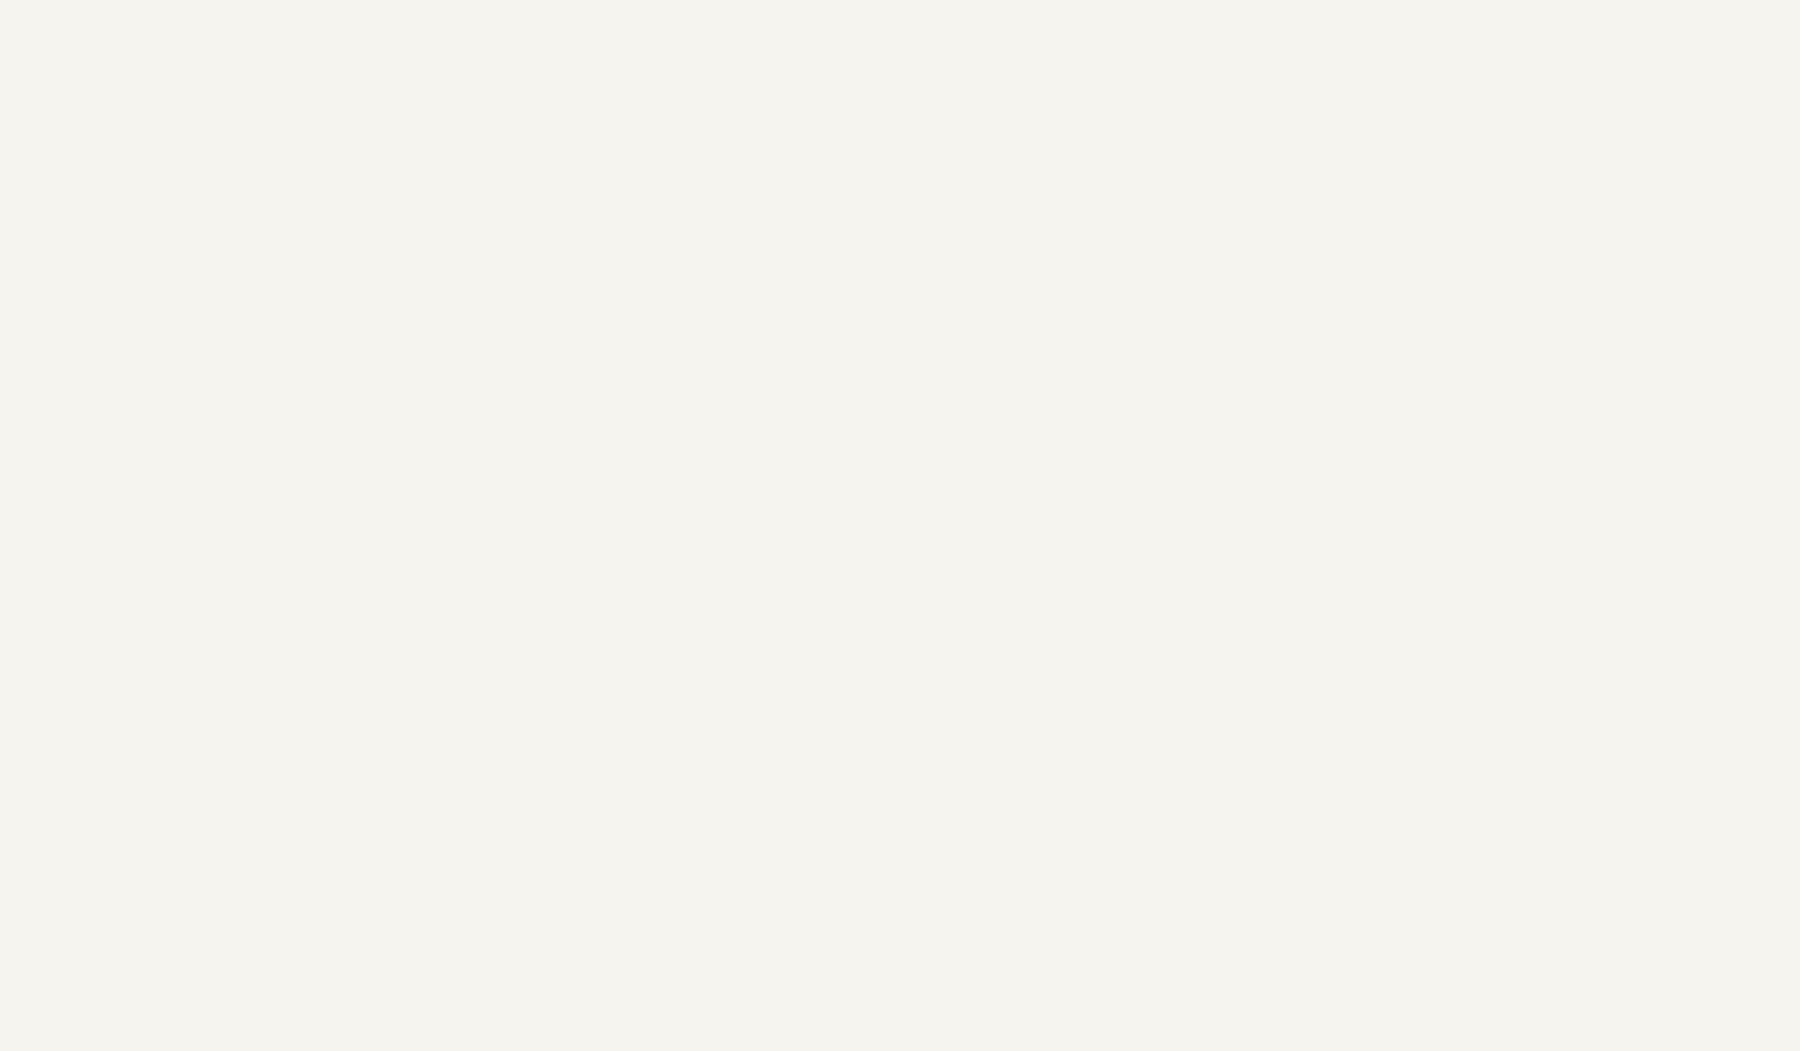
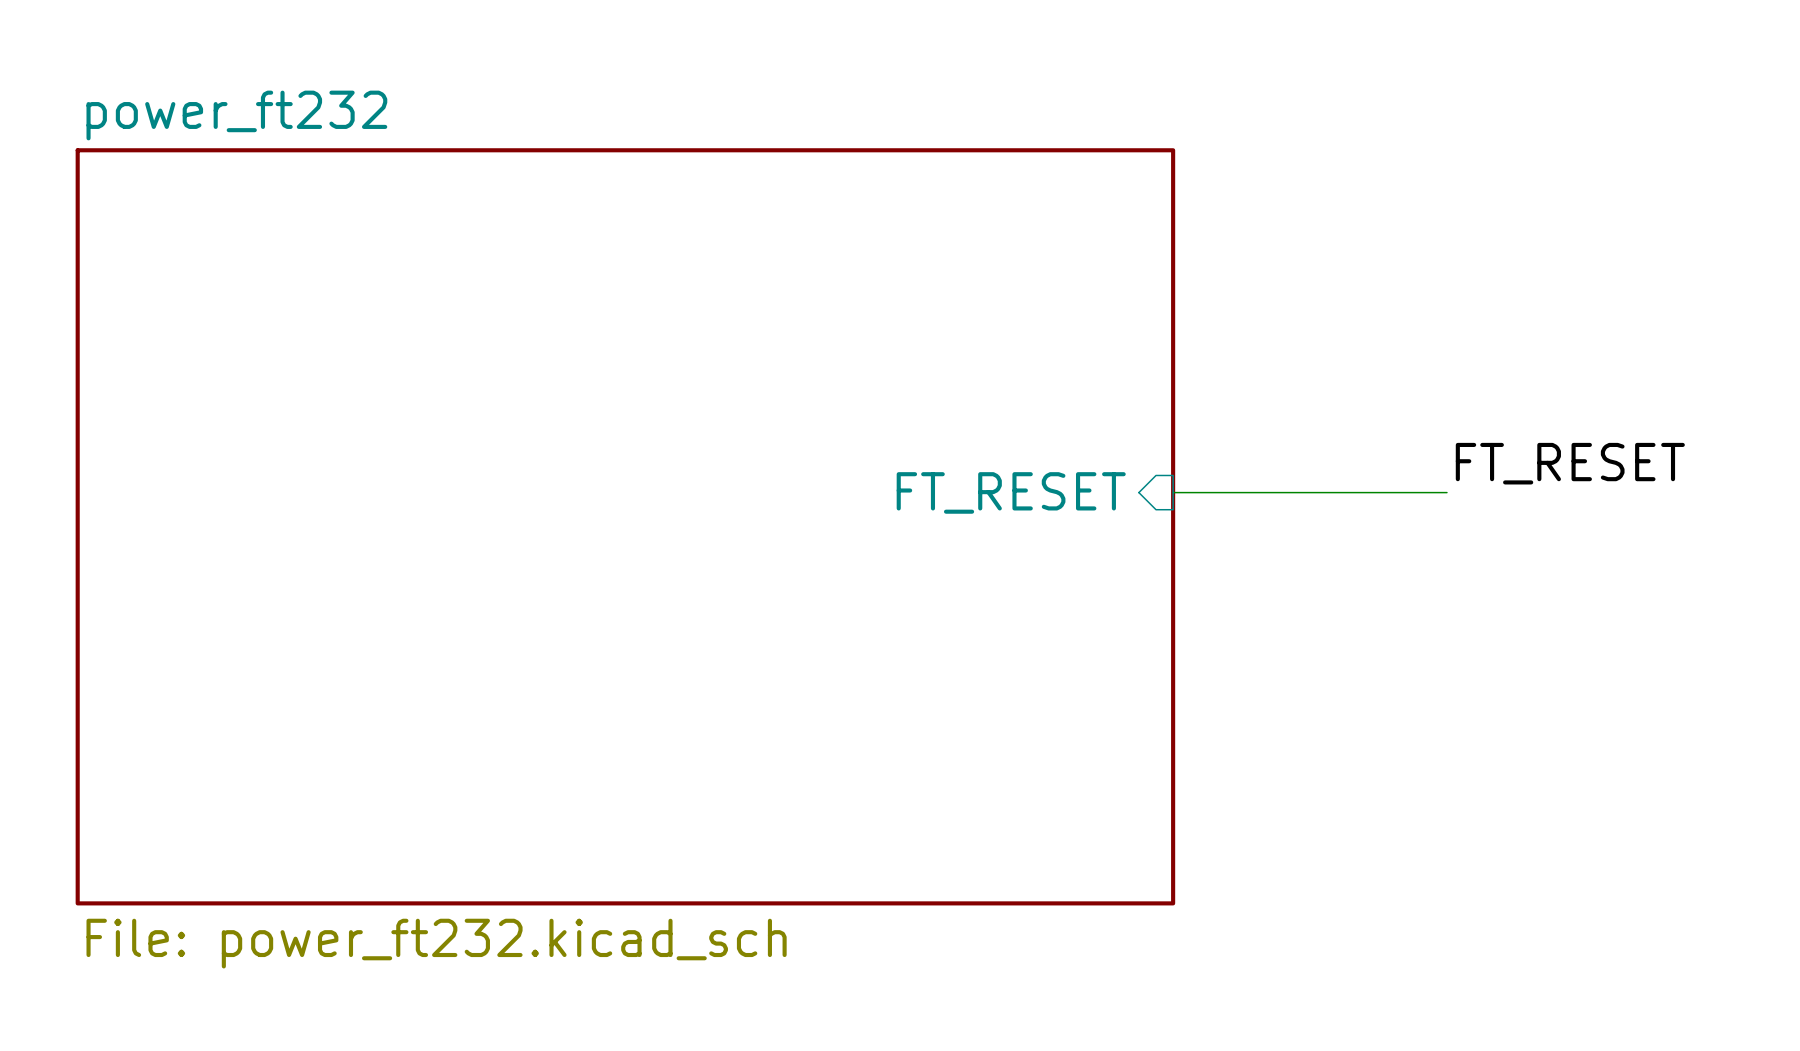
label: none -> FT_RESET (1570, 463)
sheet pin: none -> FT_RESET (1011, 492)
wire: none -> (1173, 492) (1446, 492)
sheet power_ft232: none -> File: power_ft232.kicad_sch (625, 526)

